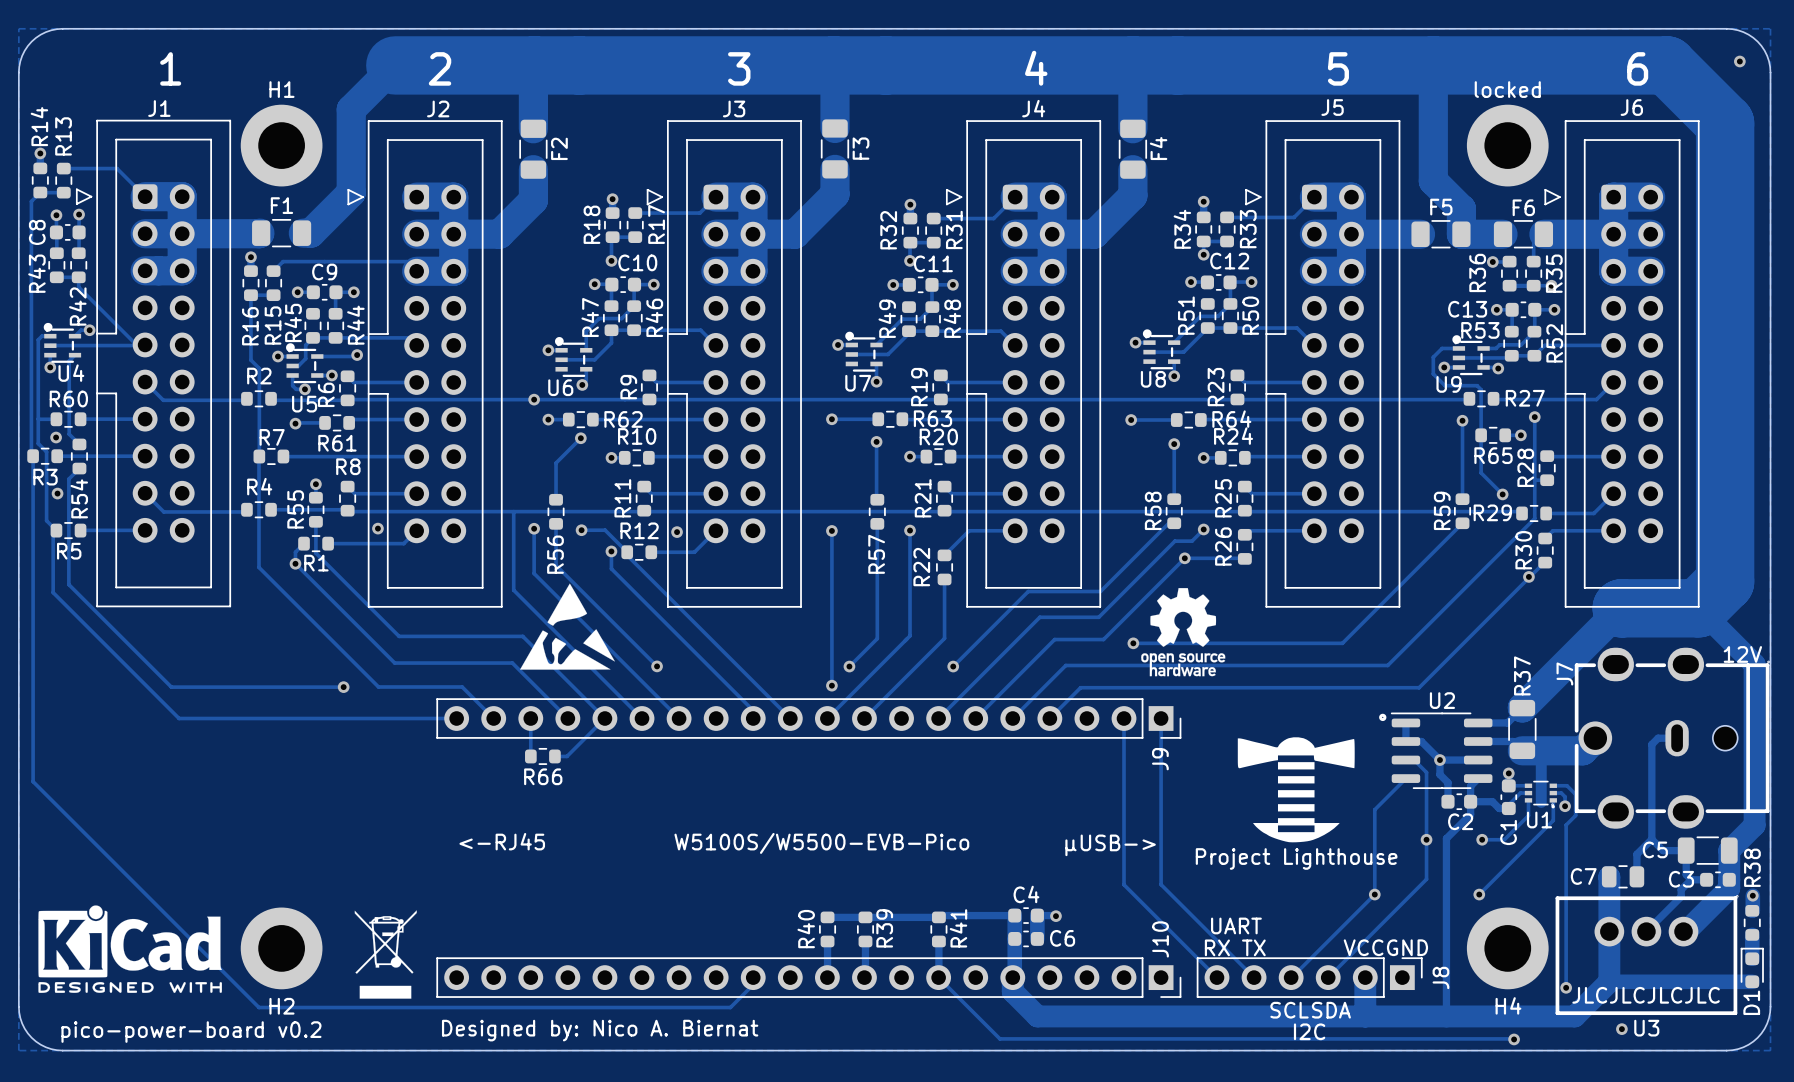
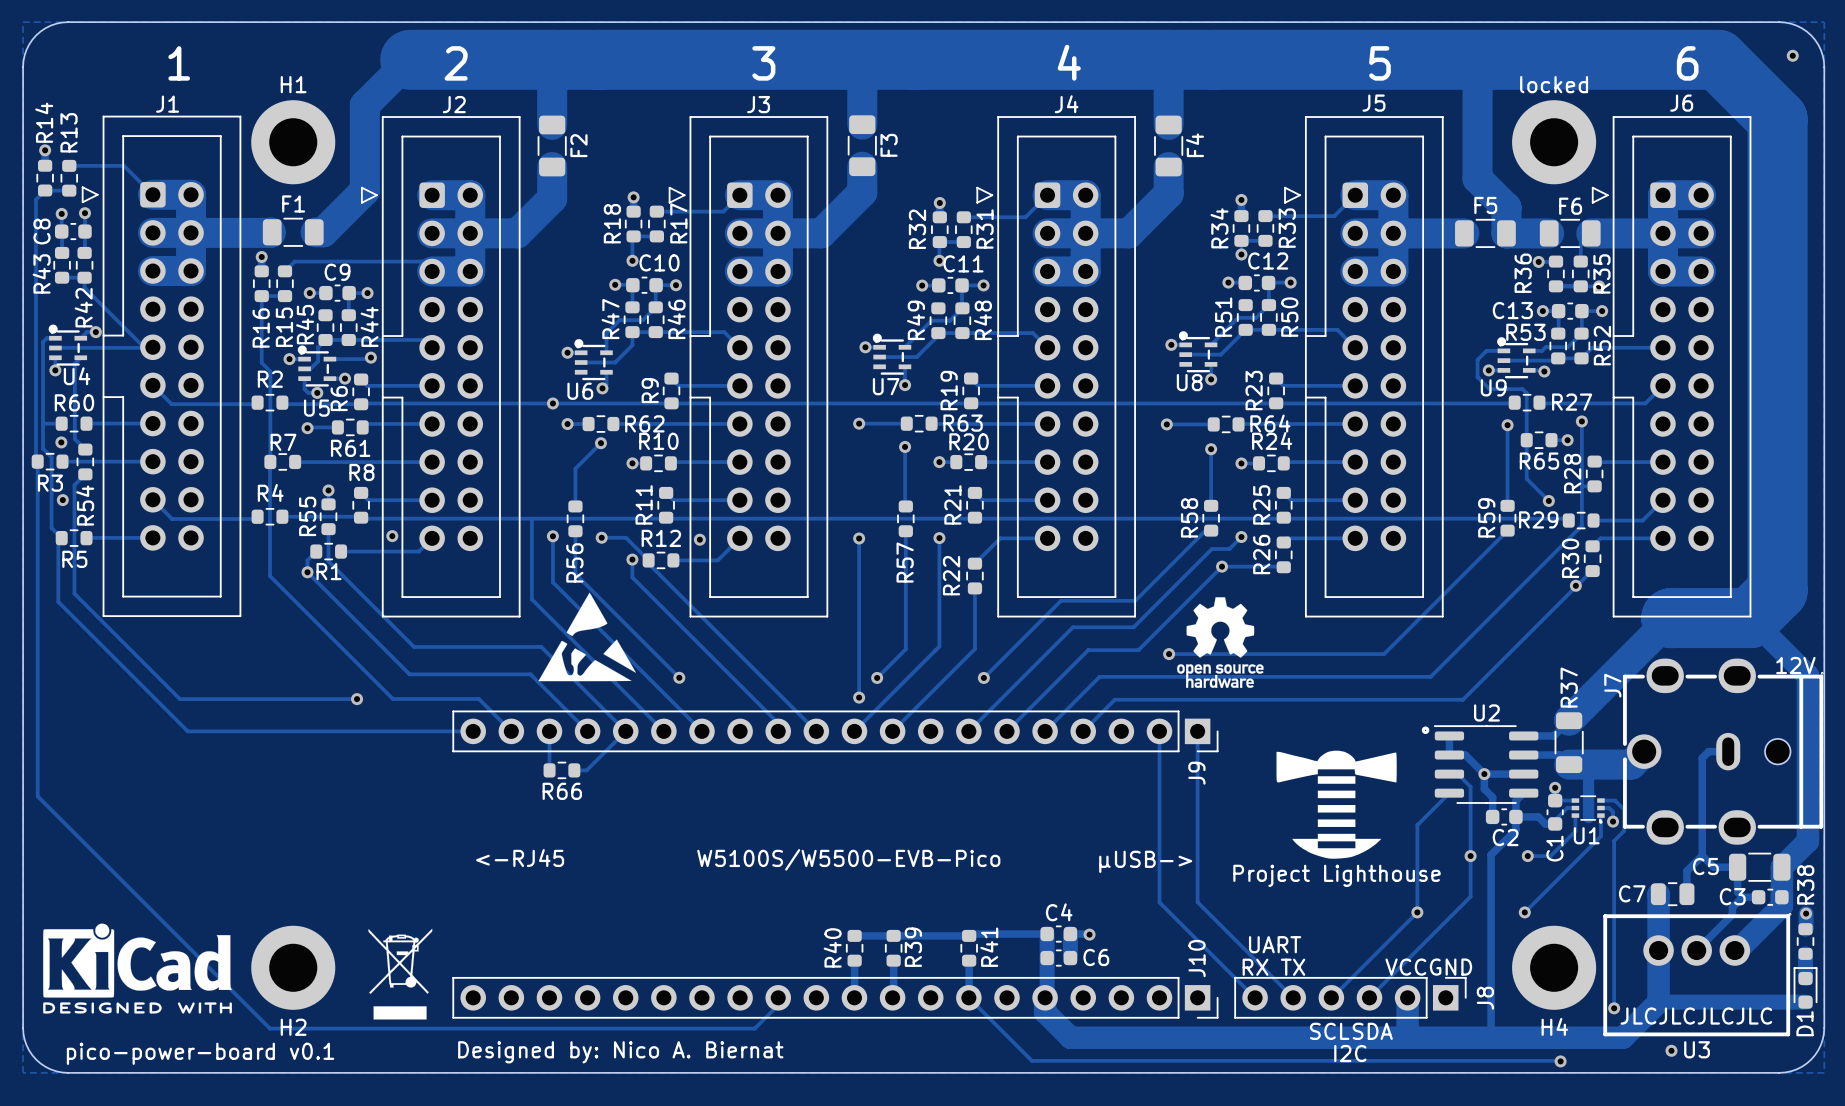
text: pico-power-board v0.2 (191, 1032) -> pico-power-board v0.1 (200, 1053)

